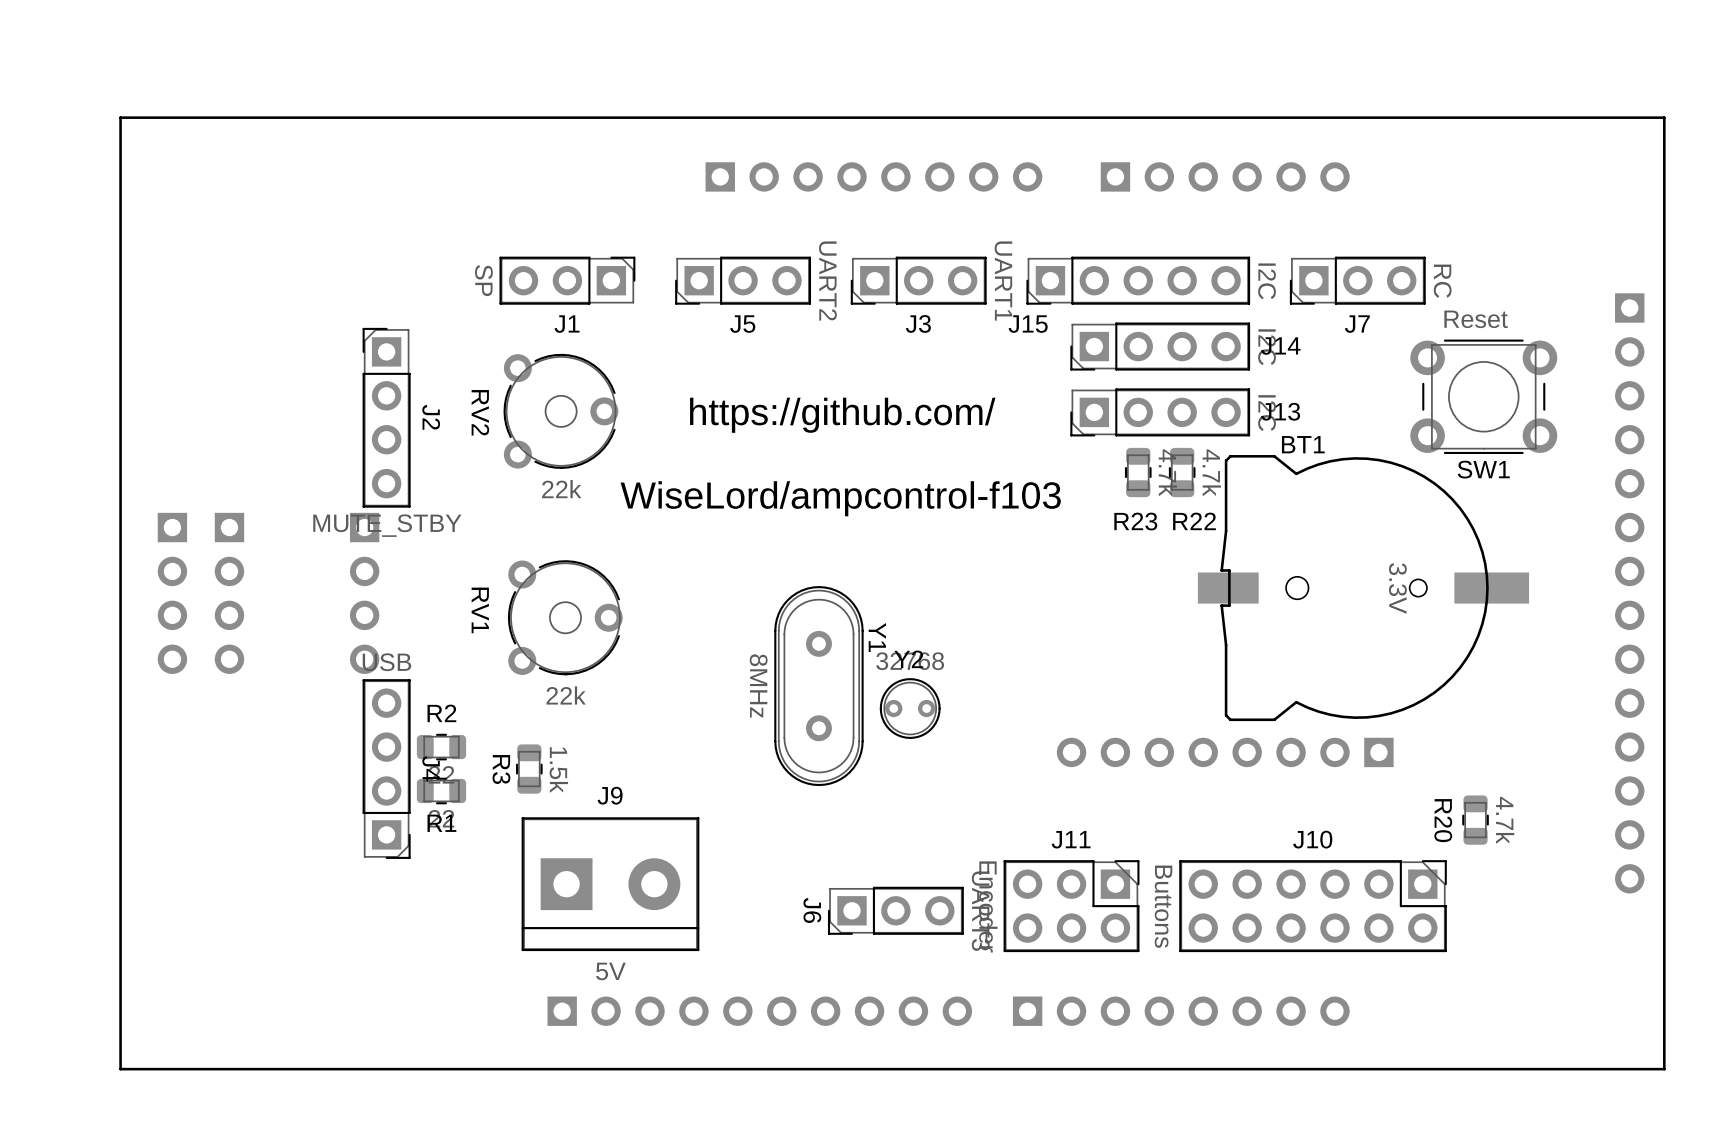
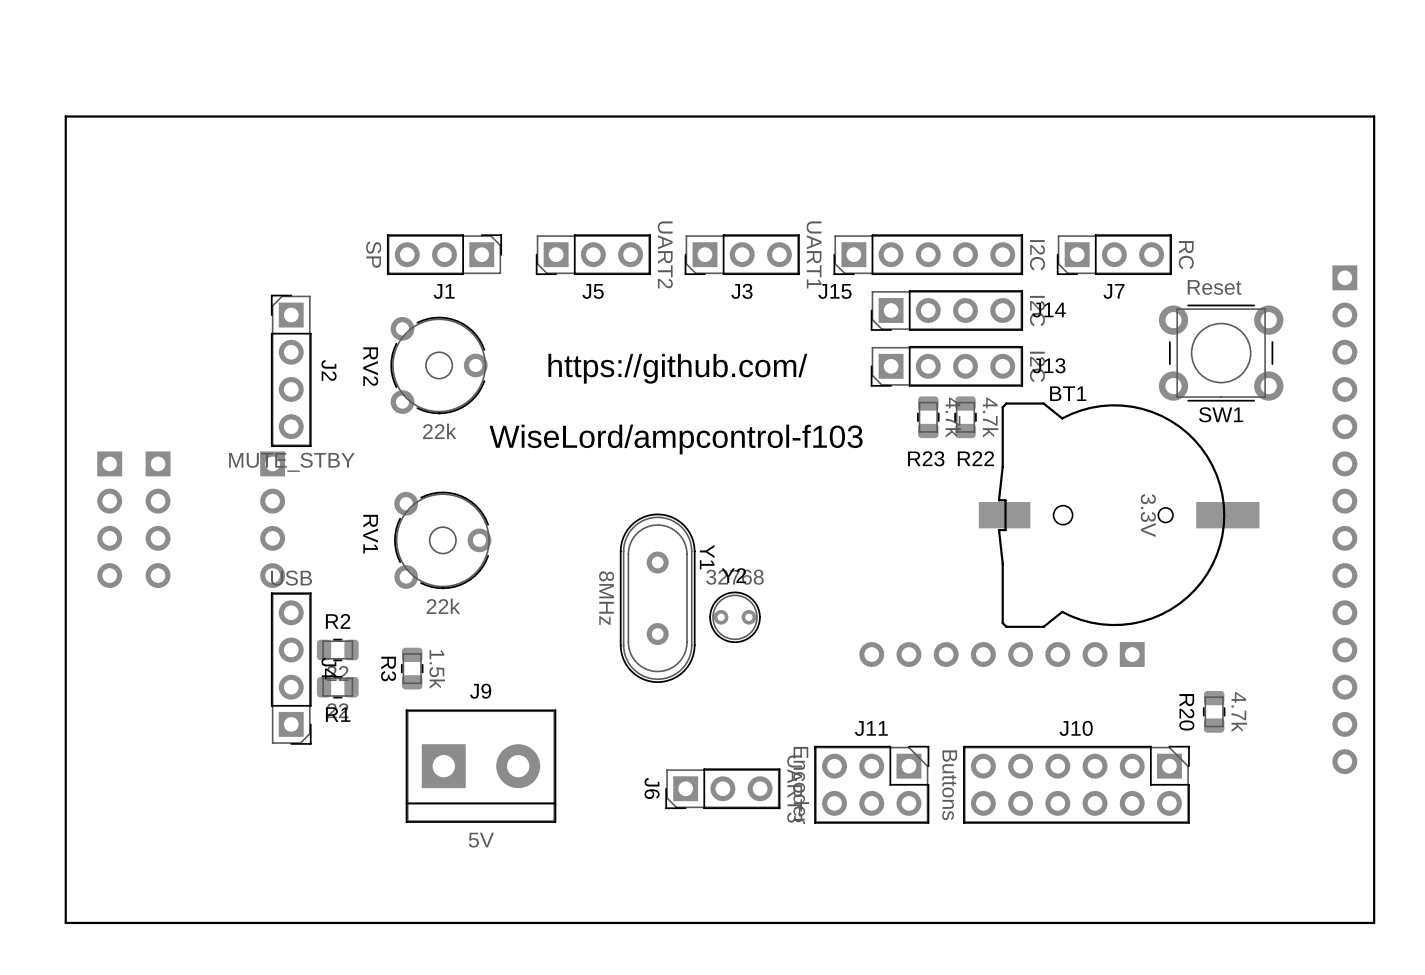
part: (873, 176) -> none
part: (1225, 176) -> none
part: (759, 1011) -> none
part: (1181, 1011) -> none

